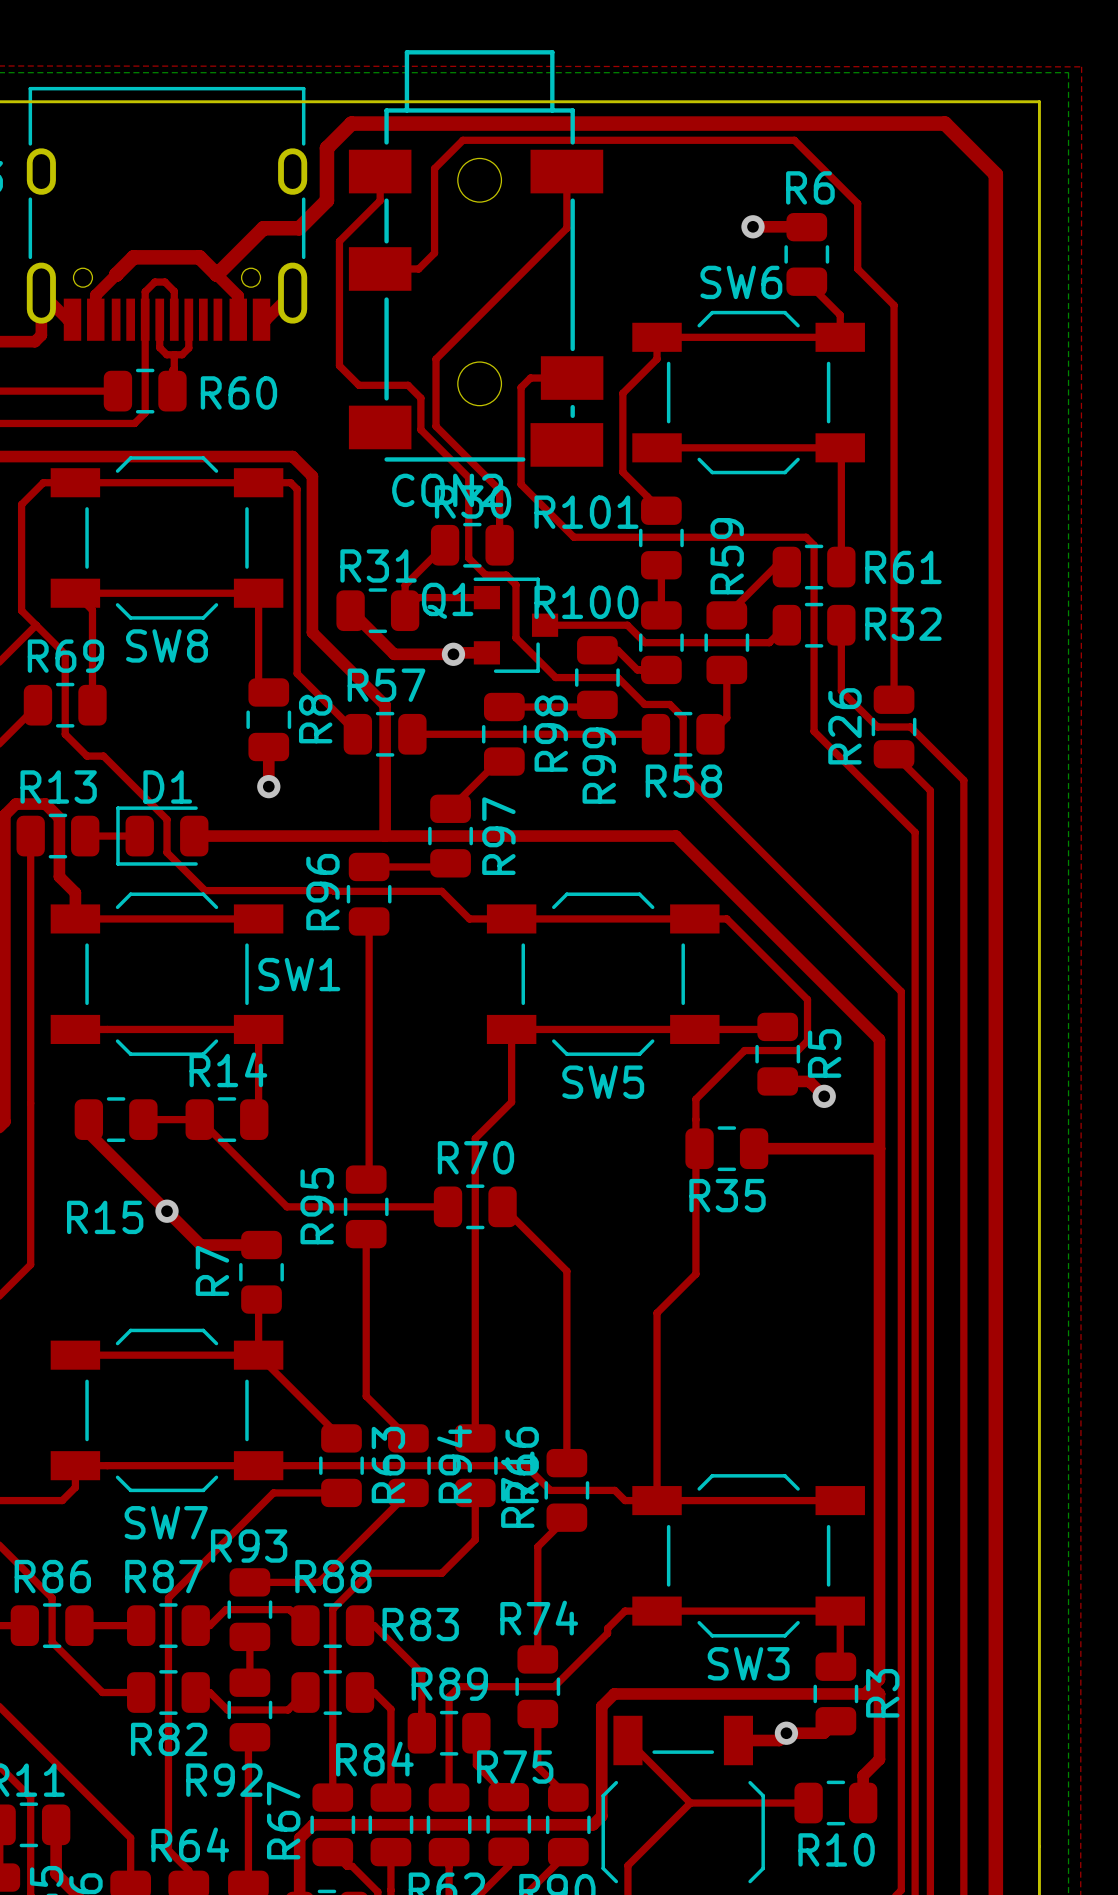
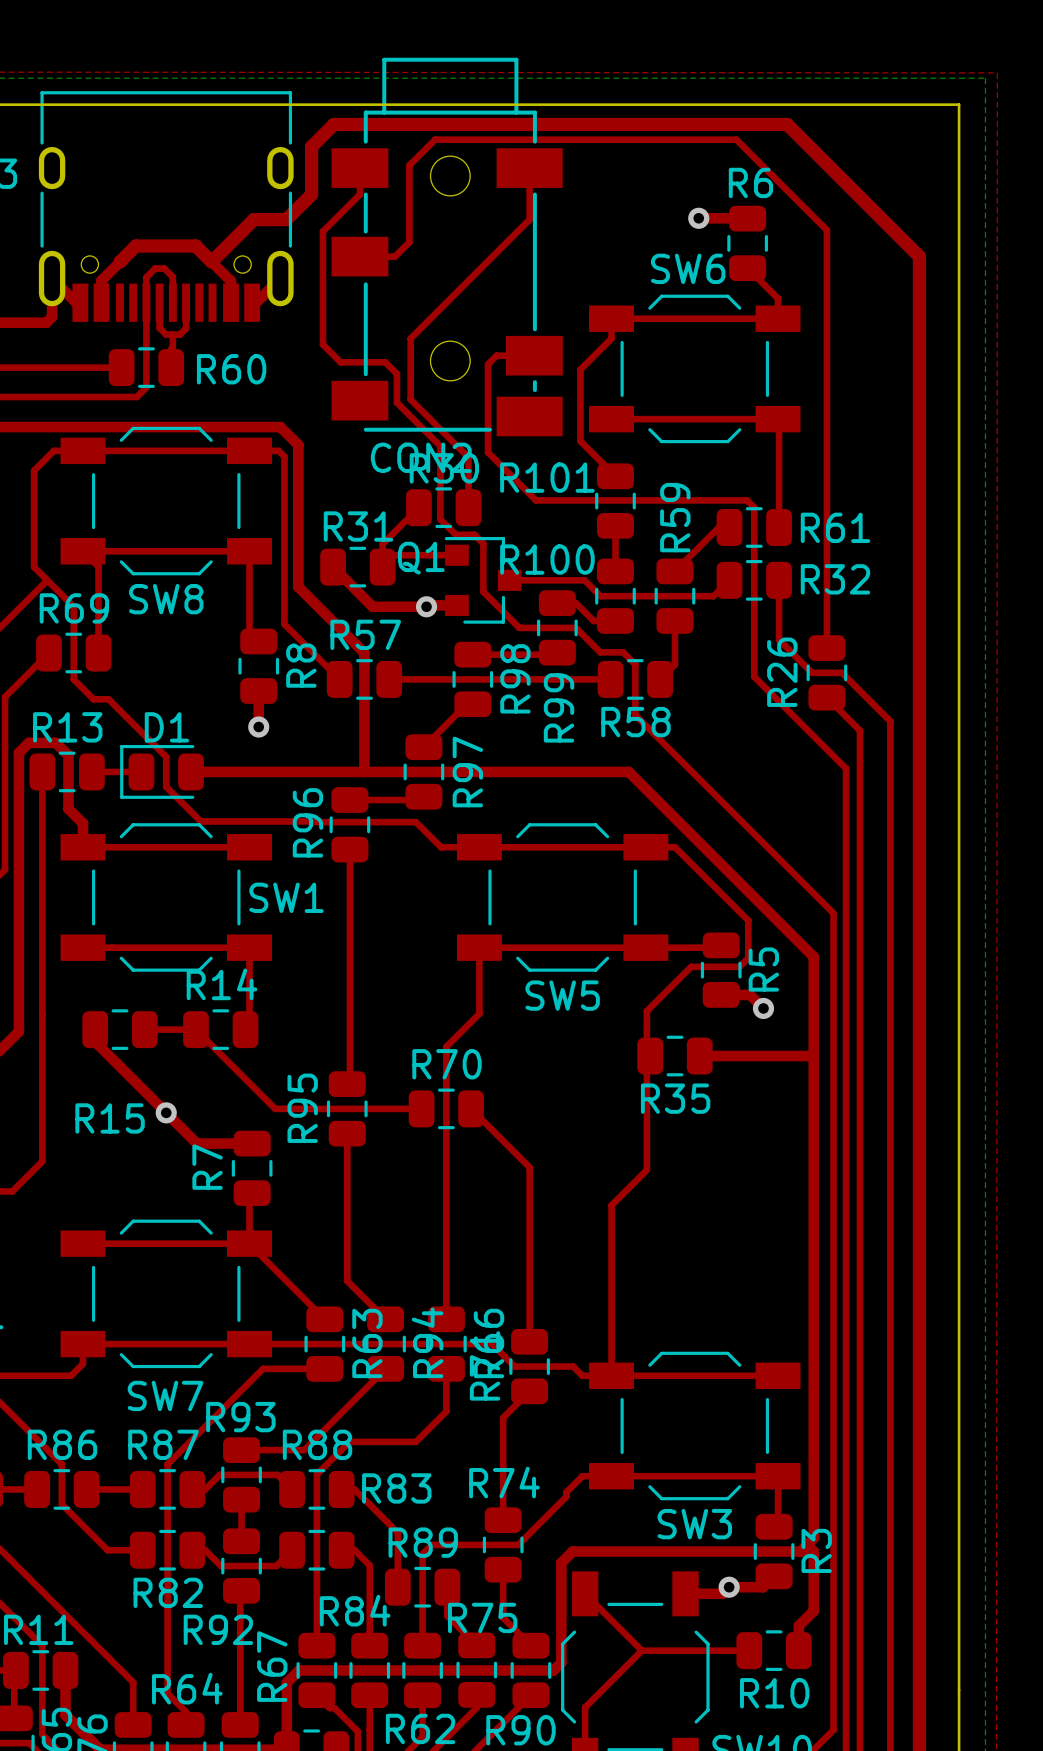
top track: (850, 123) (944, 123) (995, 174) (995, 268) -> (787, 124) (919, 256)
top track: (857, 203) (857, 268) (894, 305) -> (793, 197) (826, 230) (826, 289)

